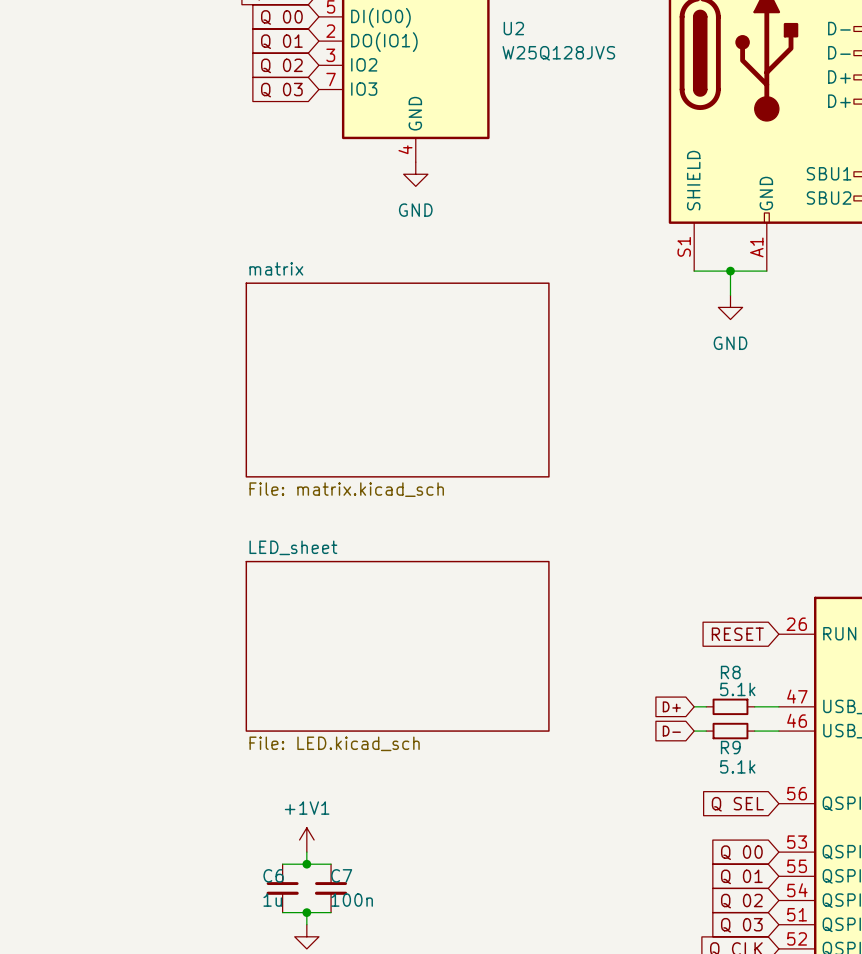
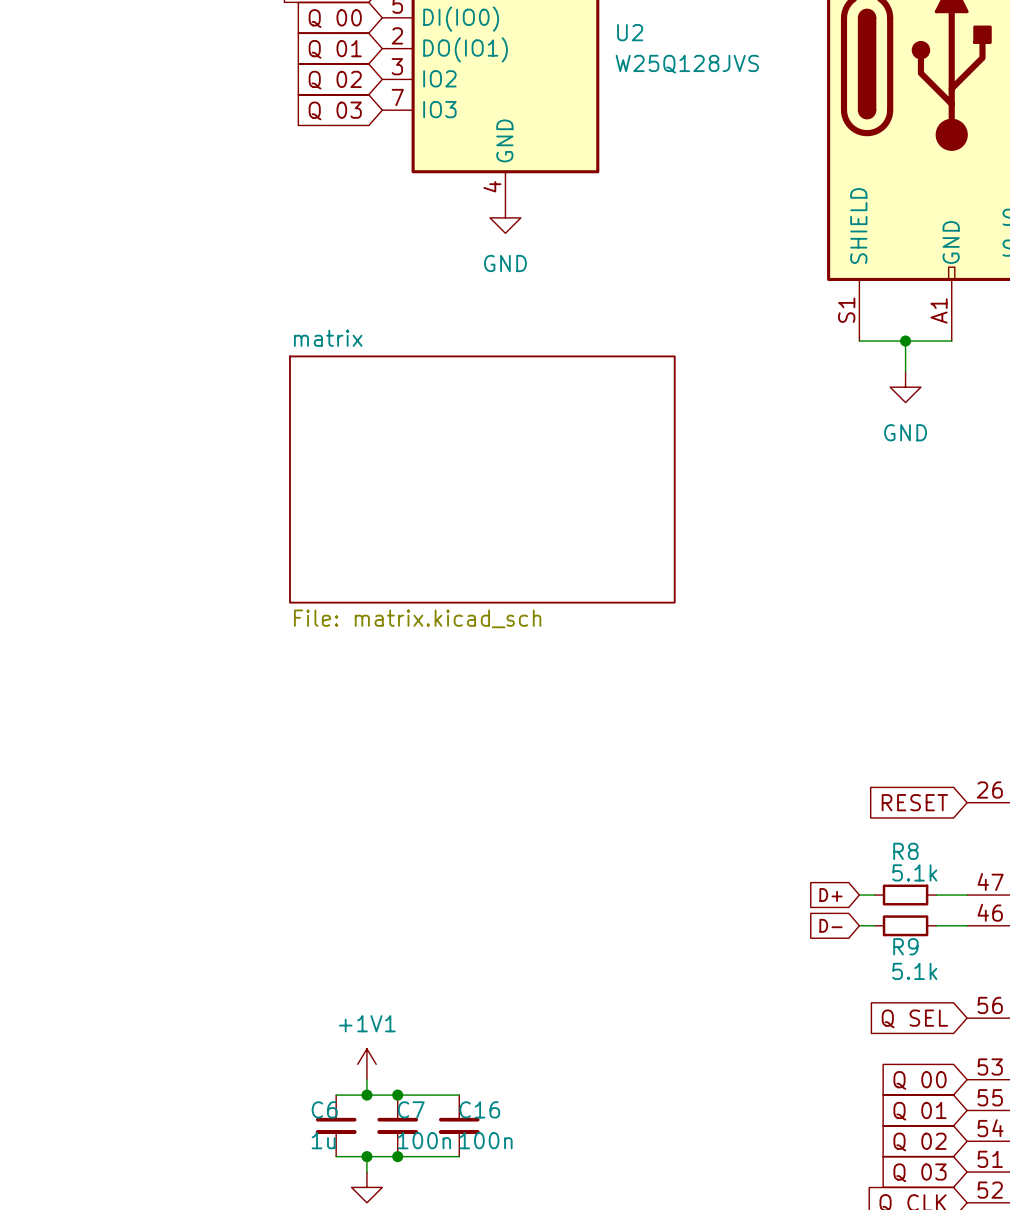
sheet LED_sheet: File: LED.kicad_sch (397, 646) -> none
wire: none -> (397, 1095) (459, 1095)
junction: none -> (397, 1095)
C16: none -> 100n (459, 1125)
wire: none -> (397, 1156) (459, 1156)
junction: none -> (397, 1156)

